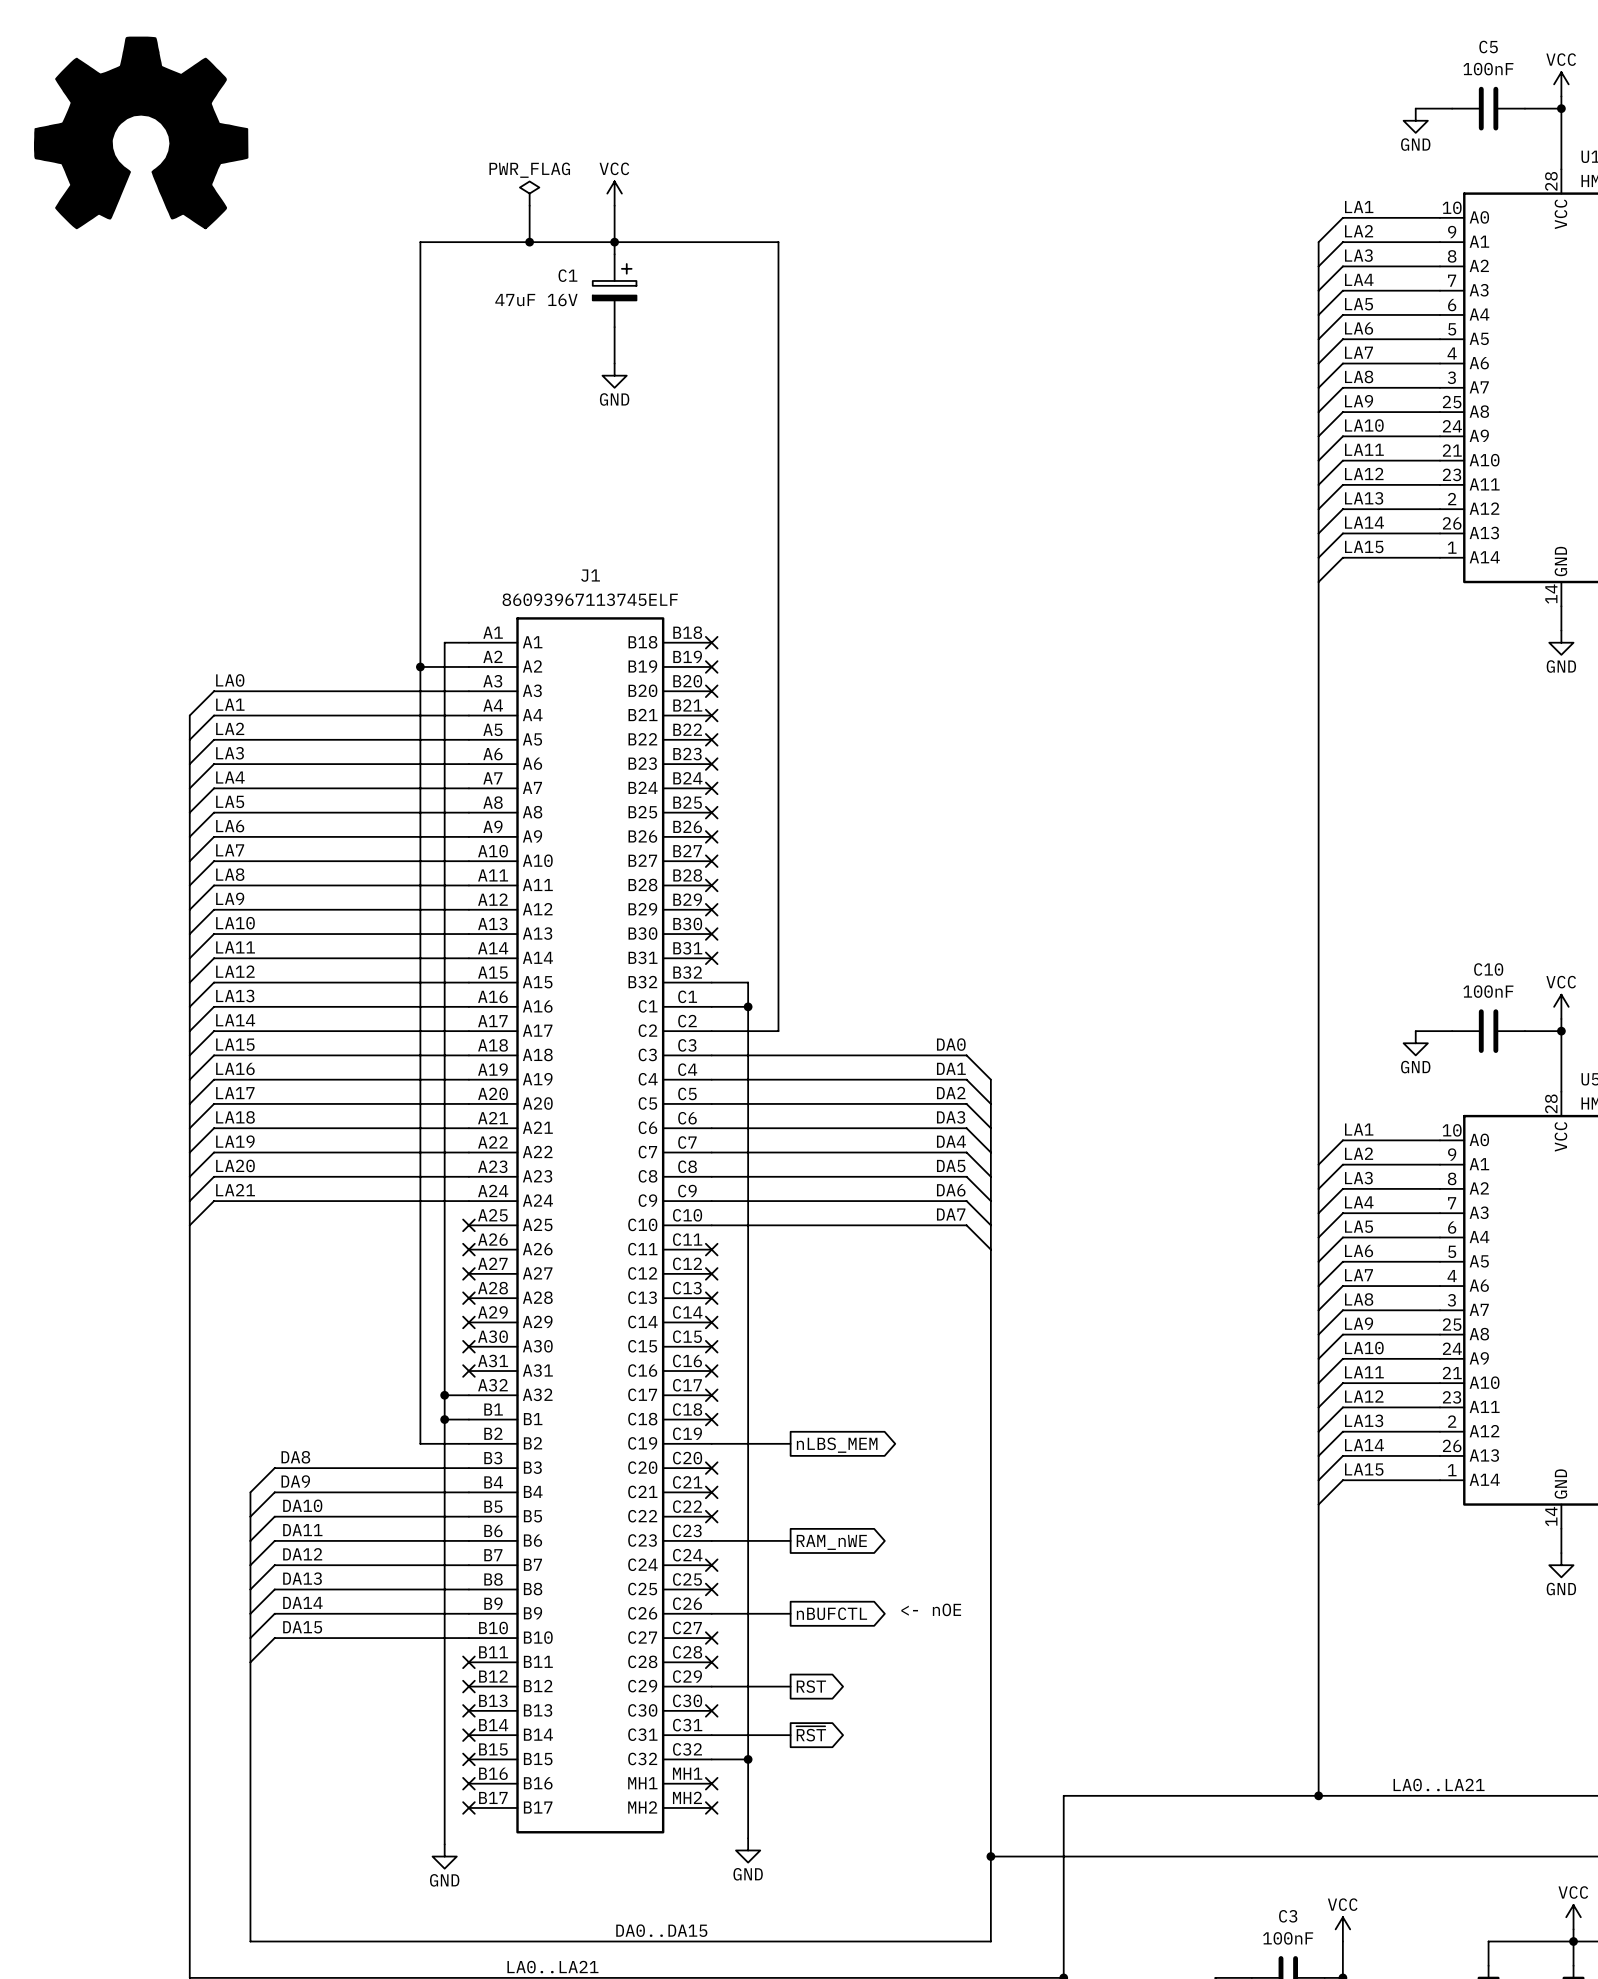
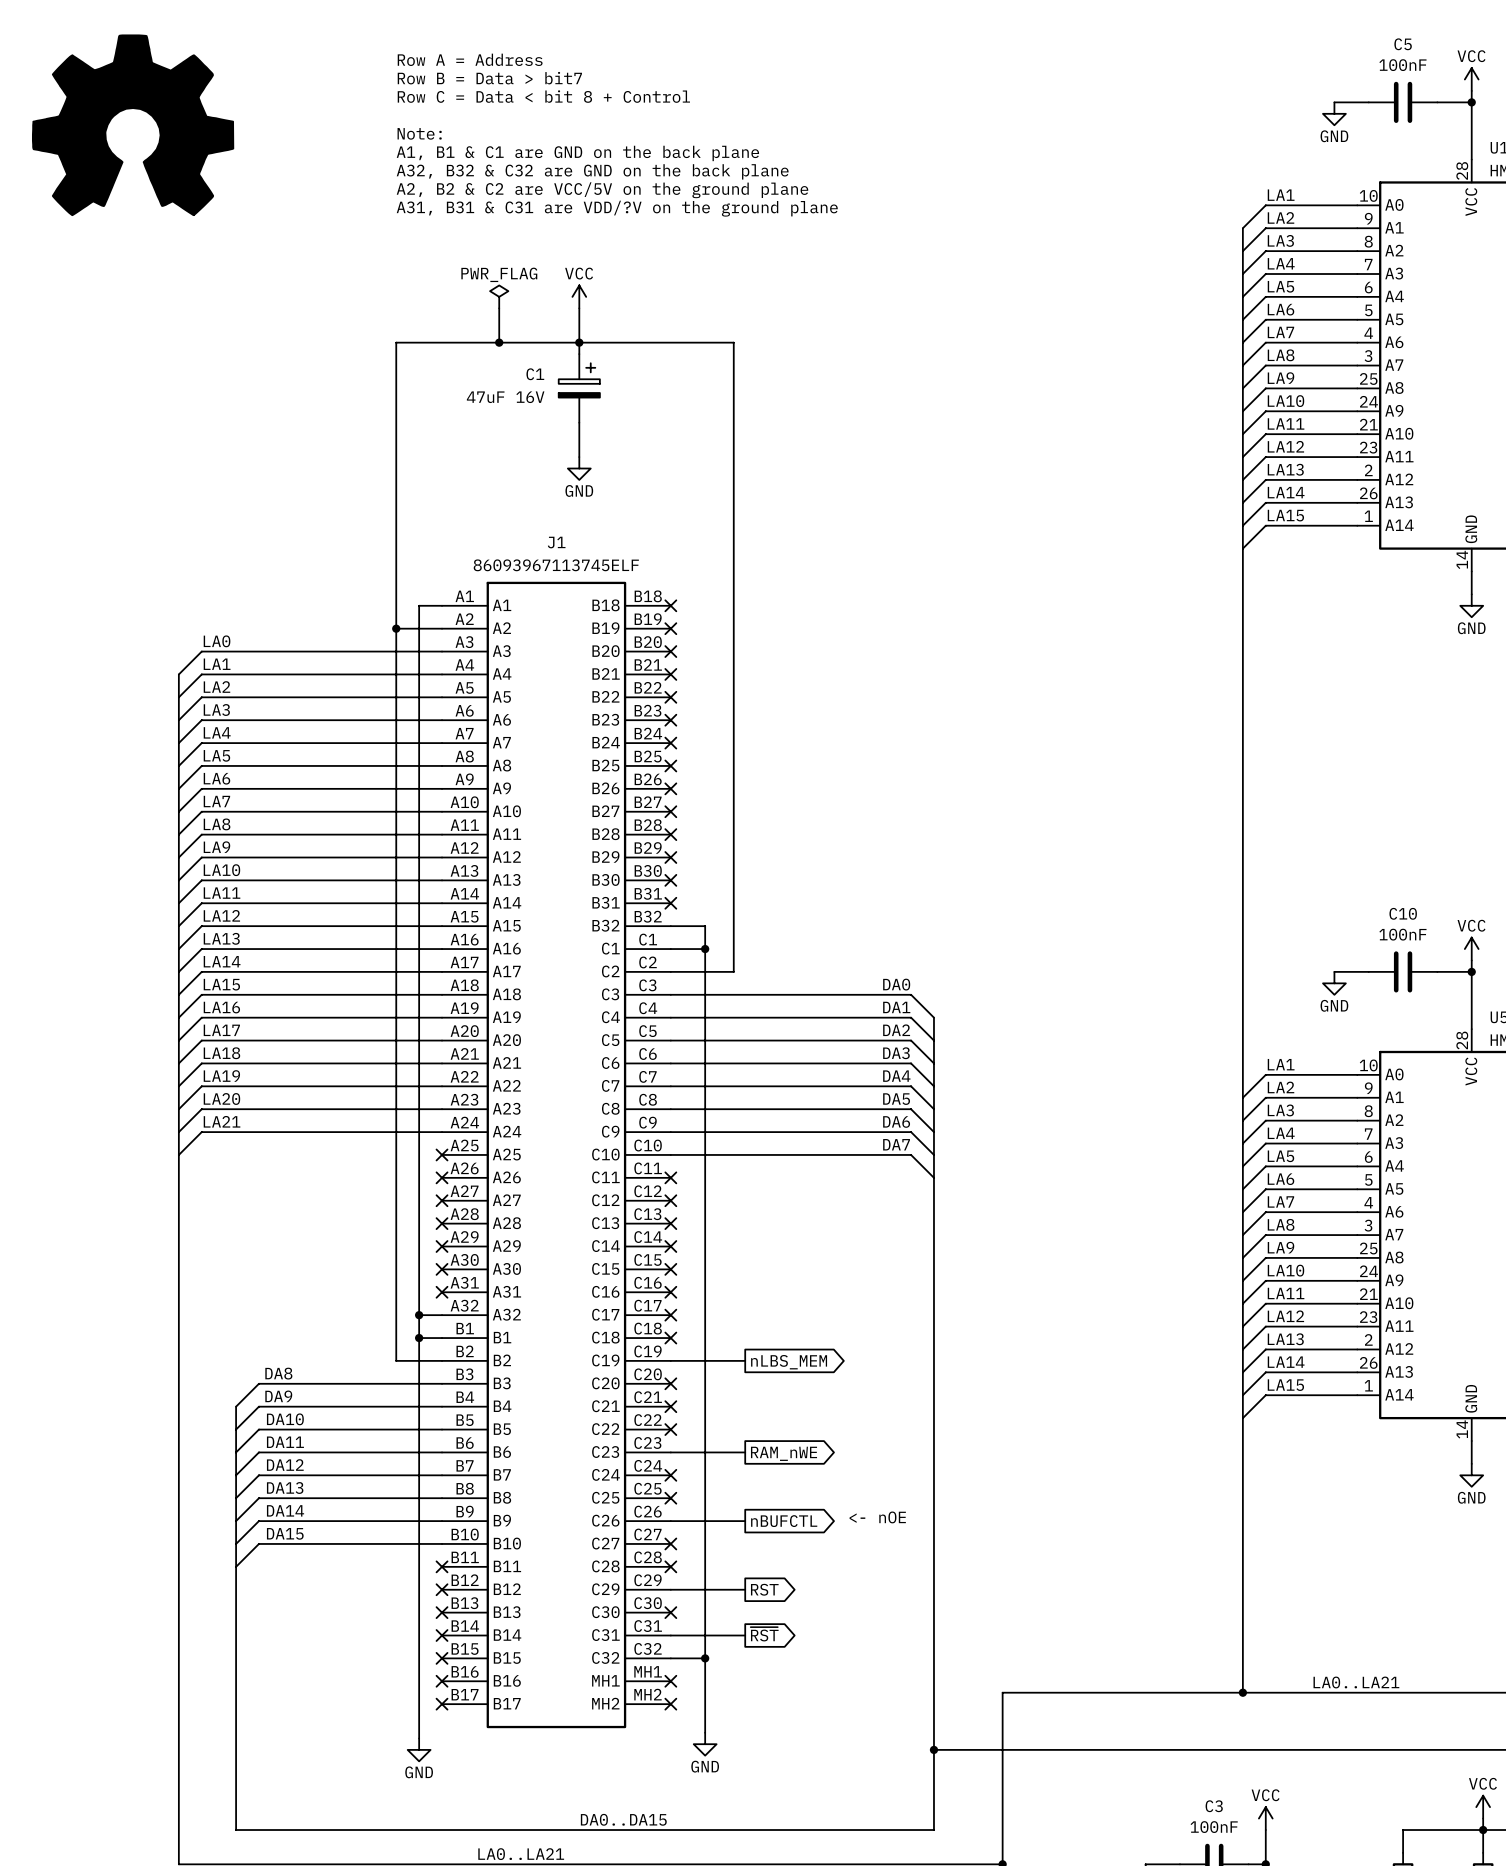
text: none -> Row A = Address (470, 59)
text: none -> Row B = Data > bit7 (489, 78)
text: none -> Row C = Data < bit 8 + Control (543, 96)
text: none -> Note: (419, 133)
text: none -> A1, B1 & C1 are GND on the back plane (577, 153)
text: none -> A32, B32 & C32 are GND on the back plane (592, 171)
power symbol position: PWR_FLAG (529, 193) -> PWR_FLAG (499, 296)
power symbol position: VCC (614, 193) -> VCC (579, 296)
text: none -> A2, B2 & C2 are VCC/5V on the ground plane (602, 190)
wire: (529, 205) (529, 242) -> (499, 308) (499, 342)
wire: (614, 205) (614, 254) -> none
text: none -> A31, B31 & C31 are VDD/?V on the ground plane (617, 208)
junction: (529, 242) -> none
junction: (614, 242) -> none
C1 position: (614, 290) -> (579, 388)
wire: (420, 363) (420, 242) (778, 242) (778, 363) -> (396, 342) (733, 342)
junction: none -> (499, 342)
junction: none -> (579, 342)
power symbol position: GND (614, 375) -> GND (579, 468)
wire: none -> (579, 422) (579, 457)

